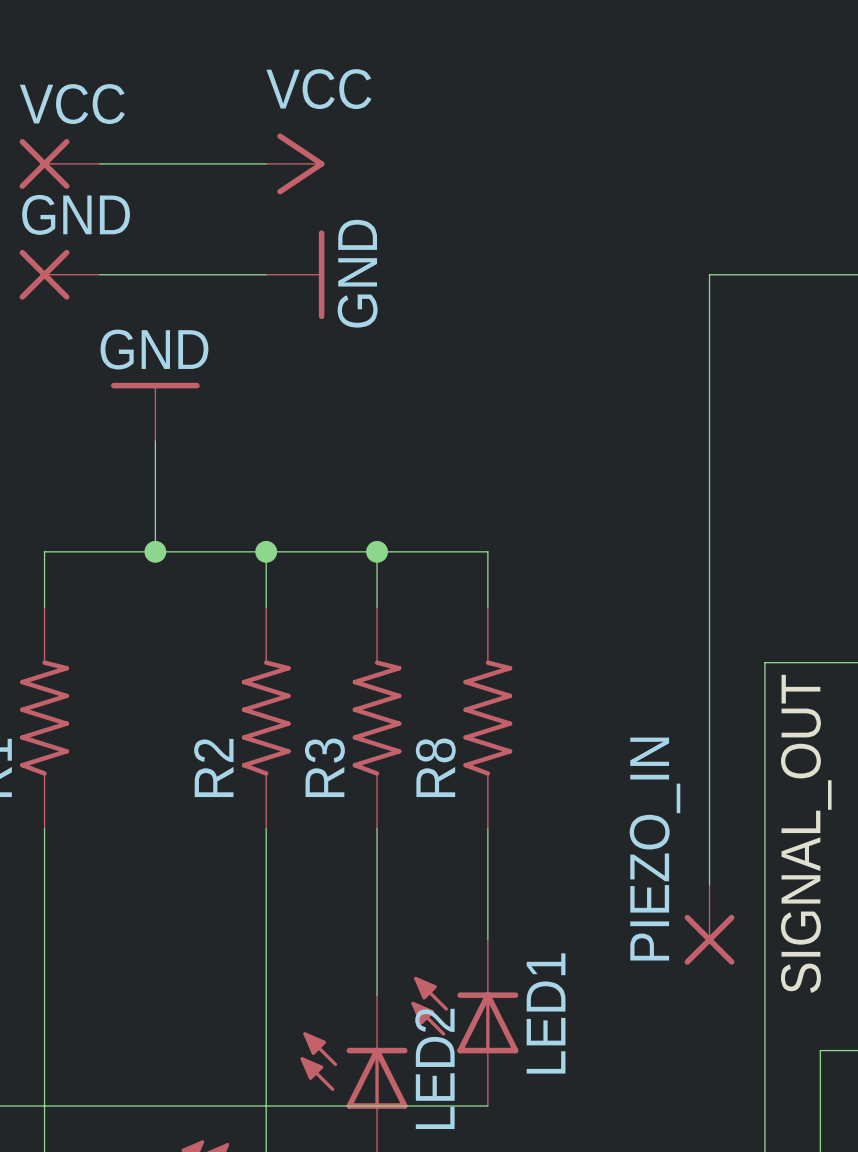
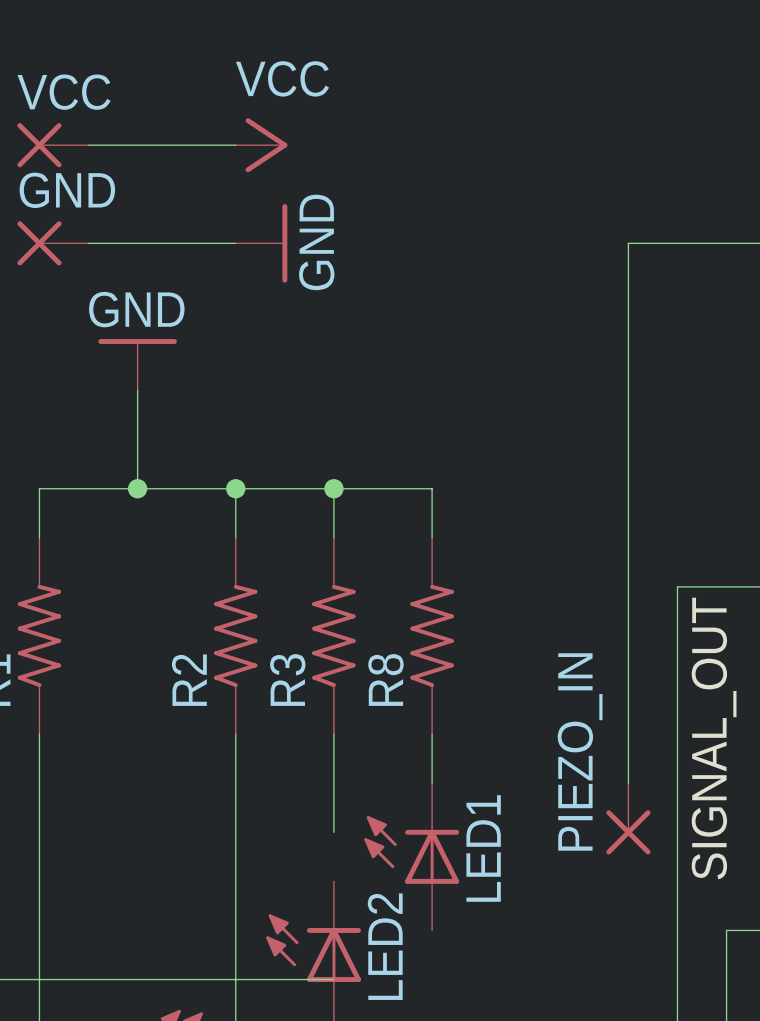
wire: (377, 939) (377, 995) -> none
LED1 position: (464, 1022) -> (411, 856)
wire: (377, 1105) (487, 1105) -> none

